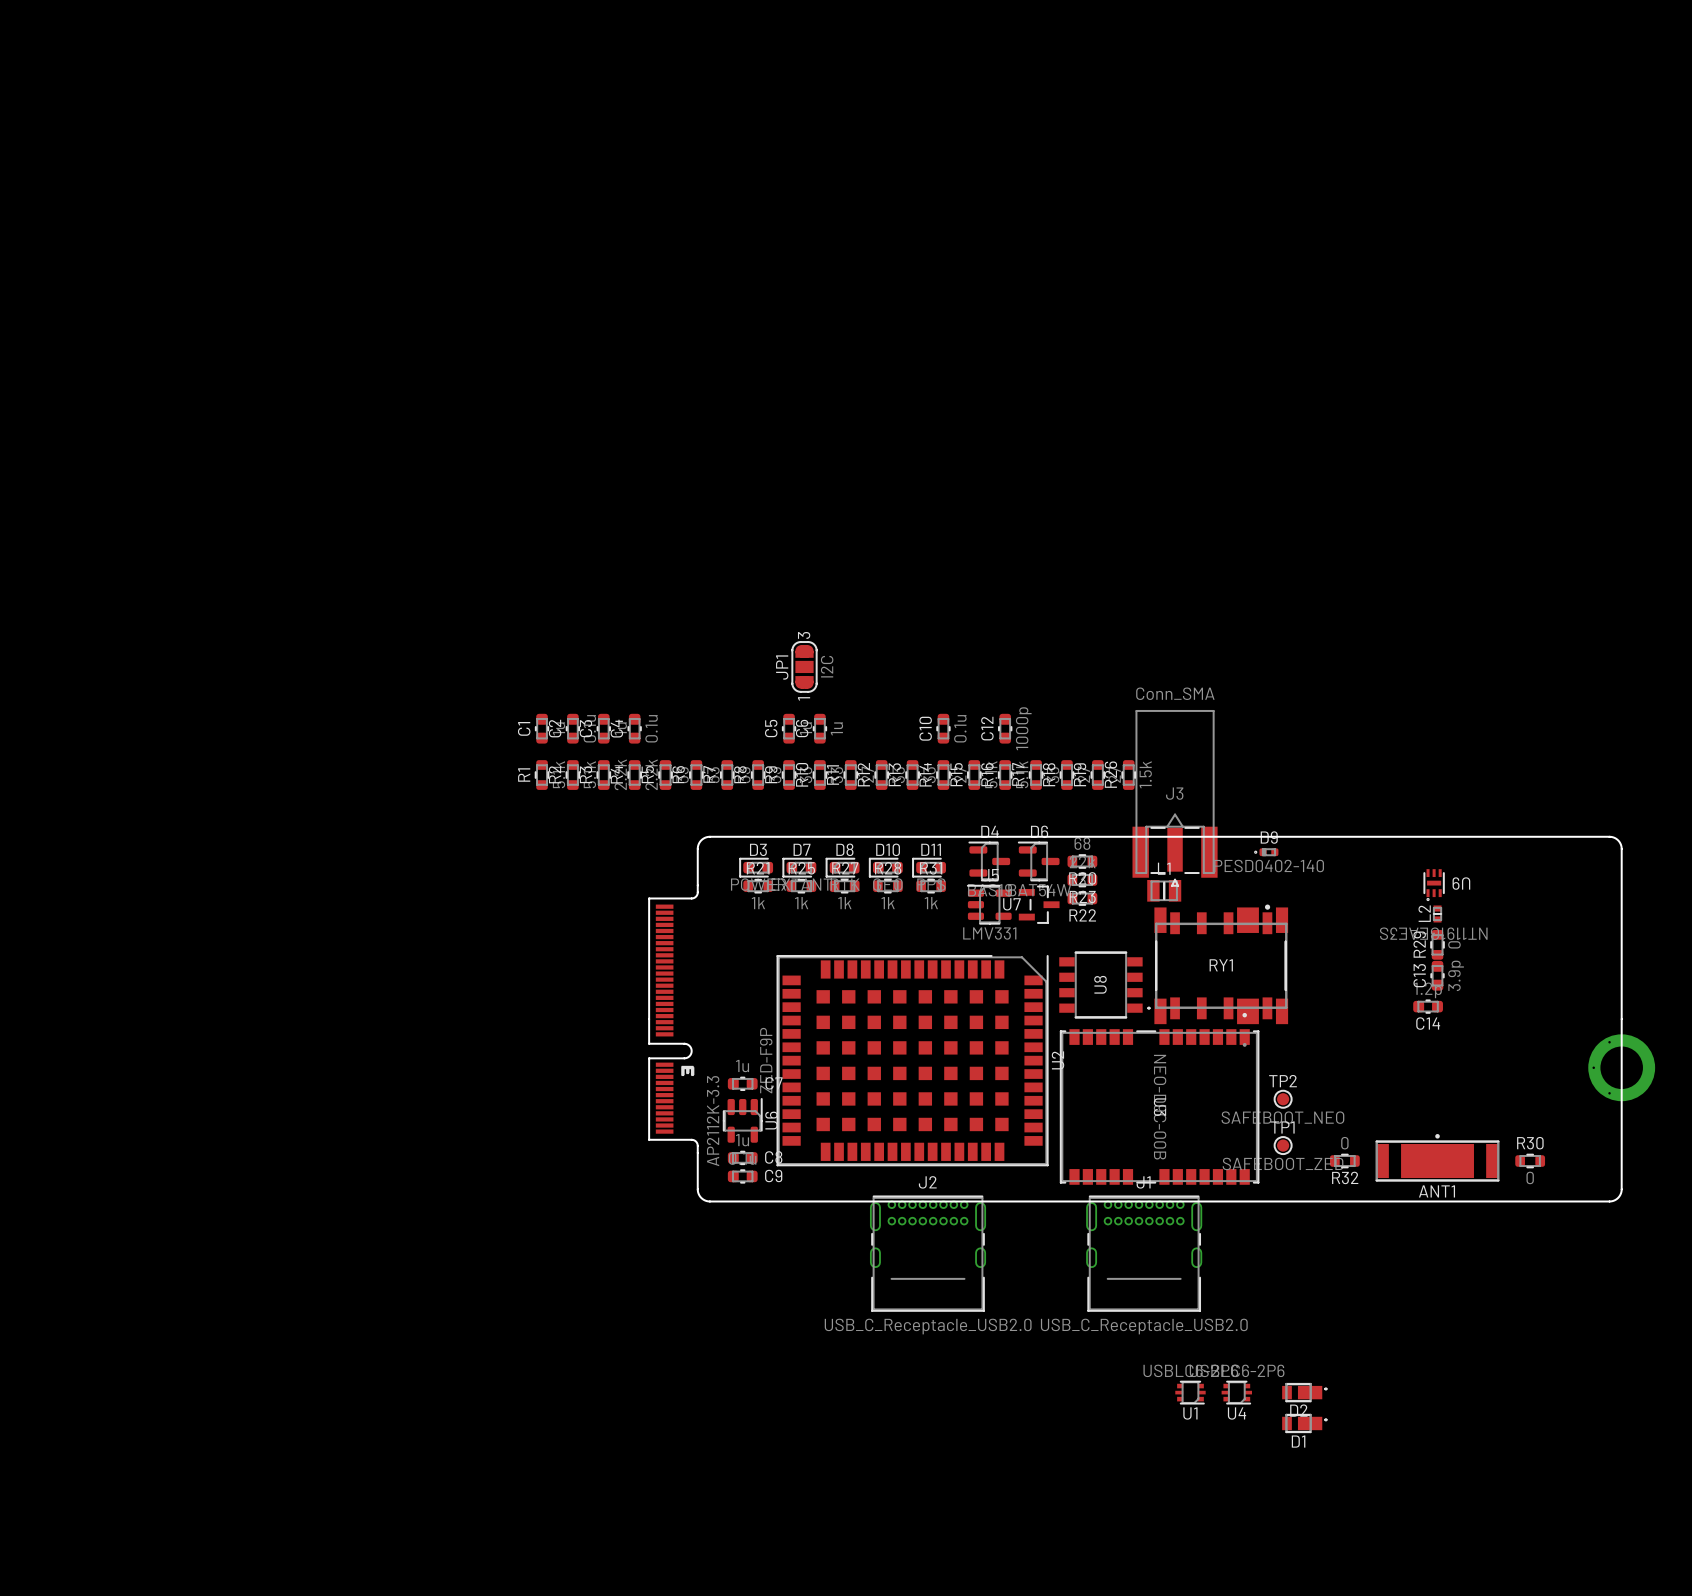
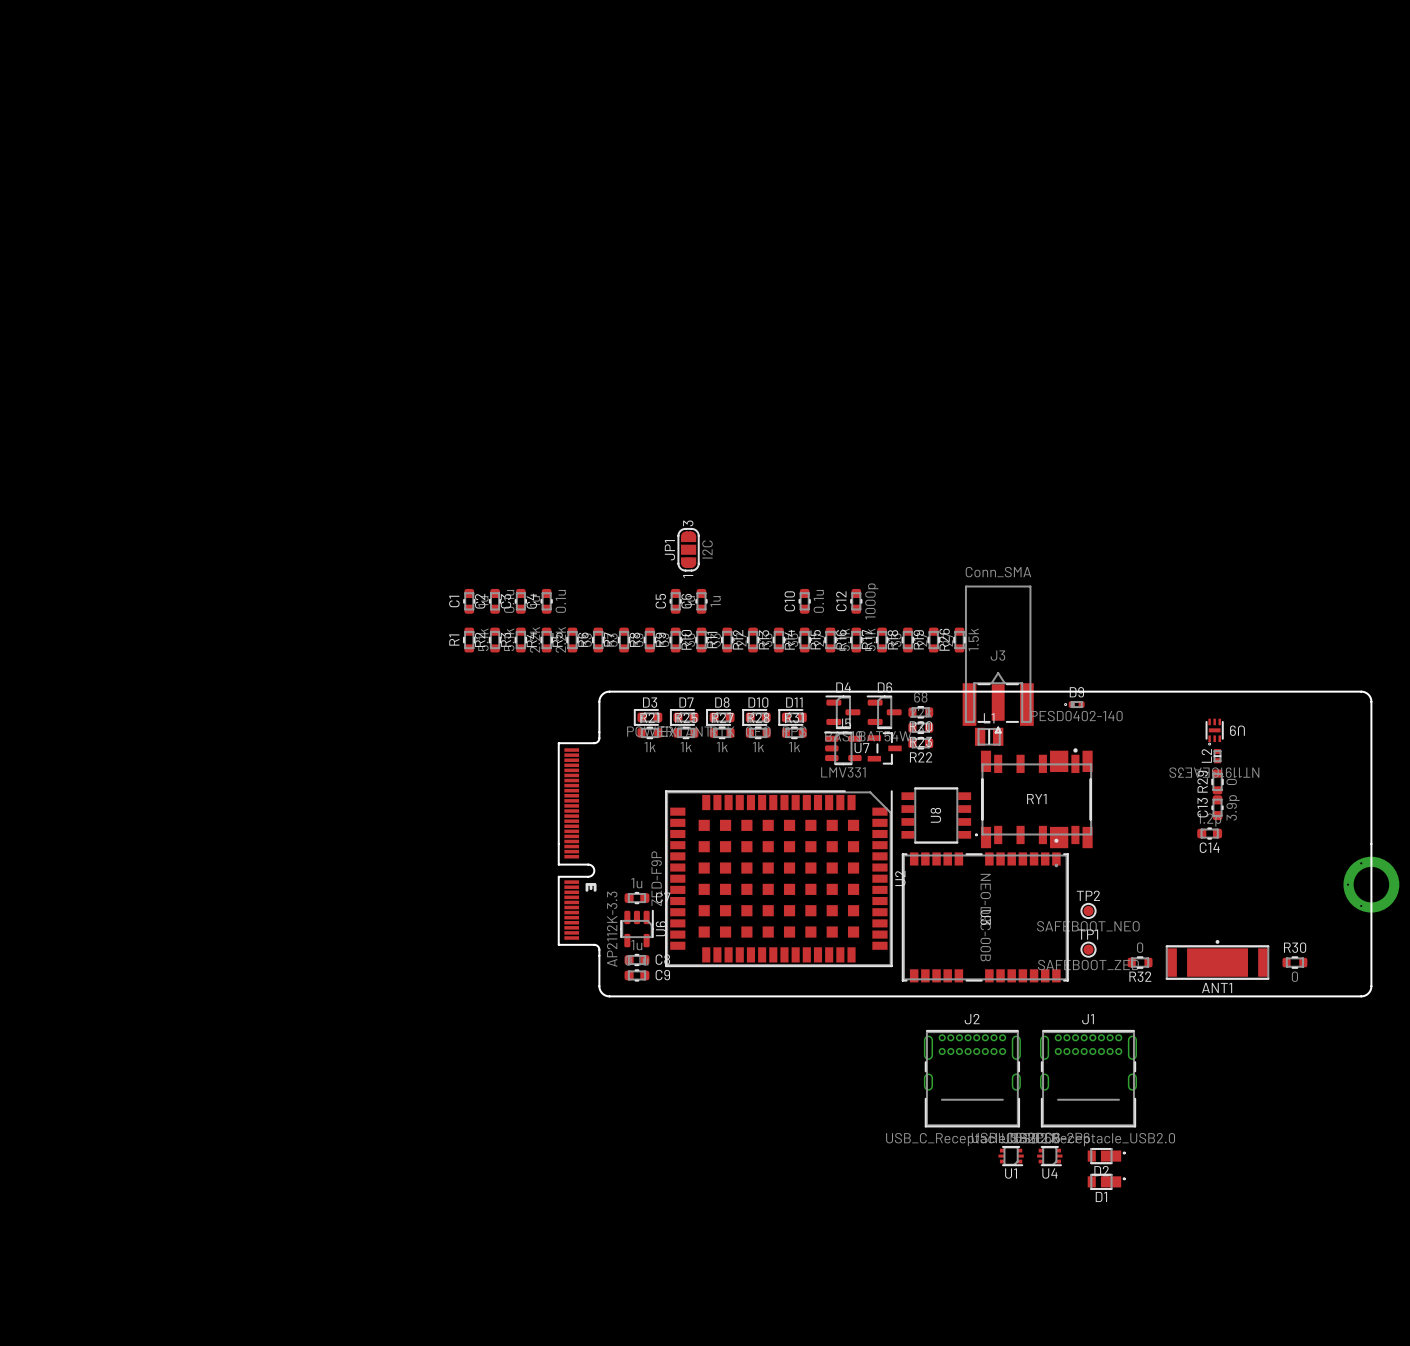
J2 position: (928, 1253) -> (972, 1078)
J1 position: (1144, 1253) -> (1088, 1078)

